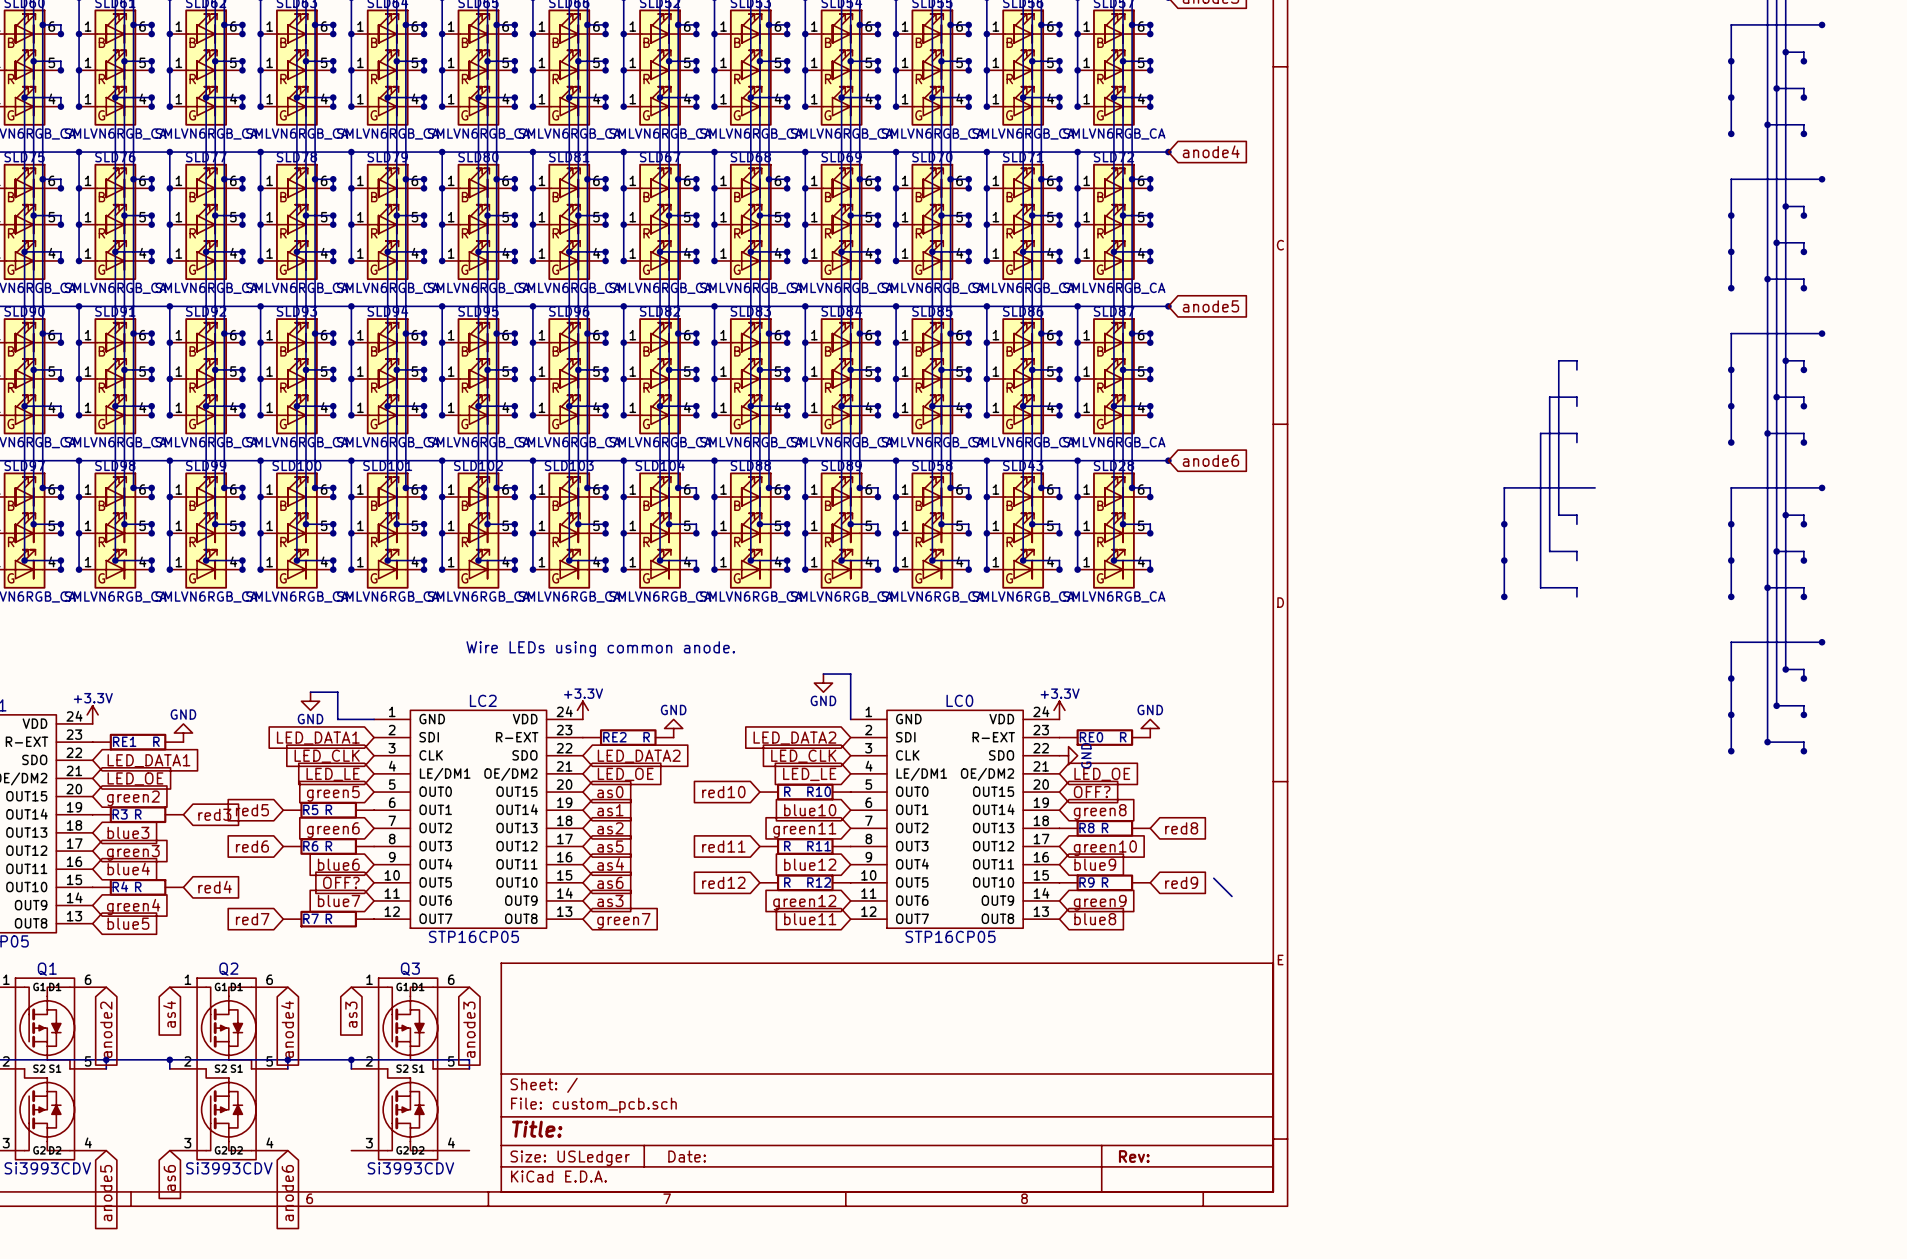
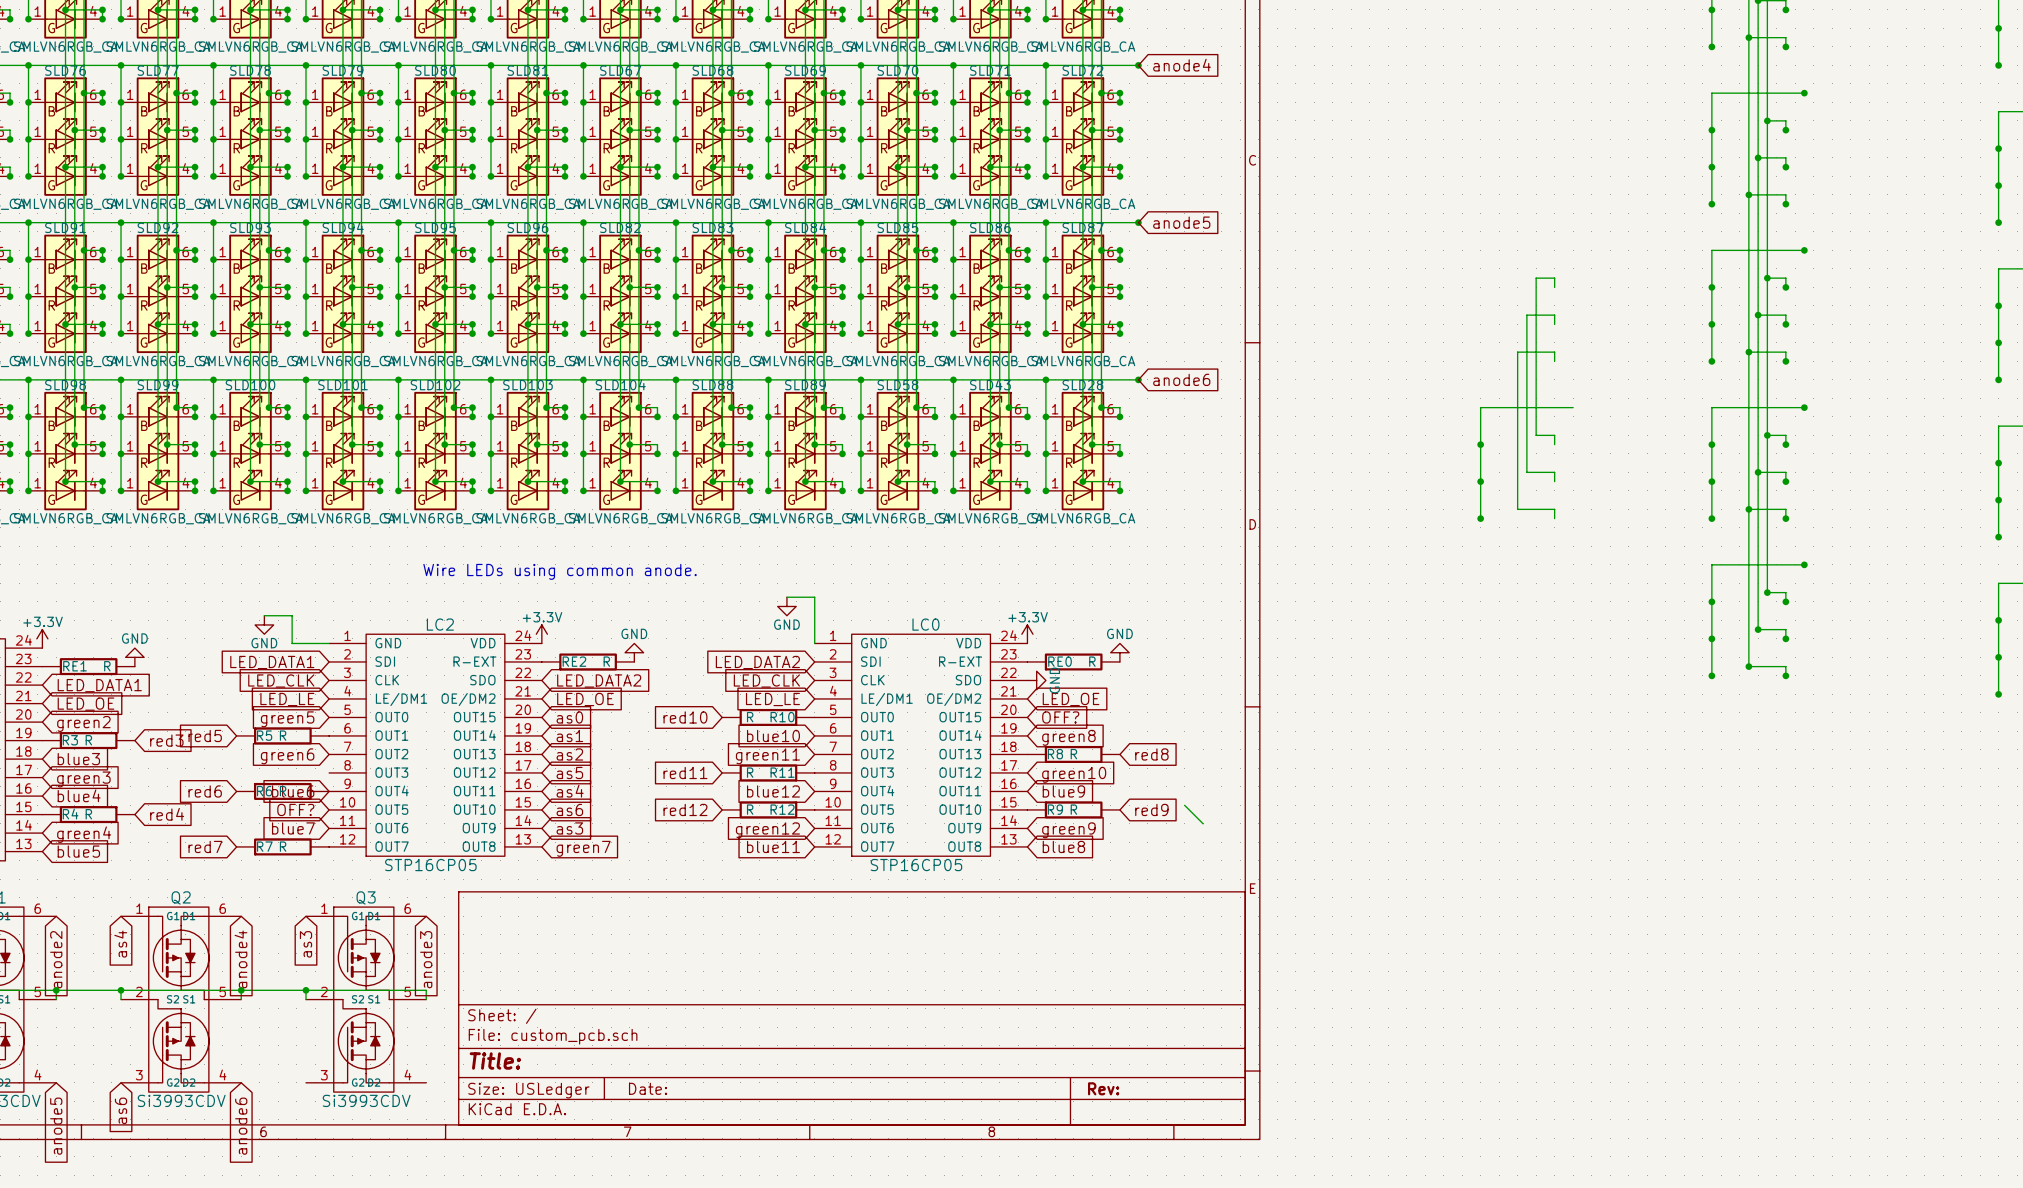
global label position: red6 (252, 846) -> red6 (205, 791)
R6 position: (328, 846) -> (282, 791)

